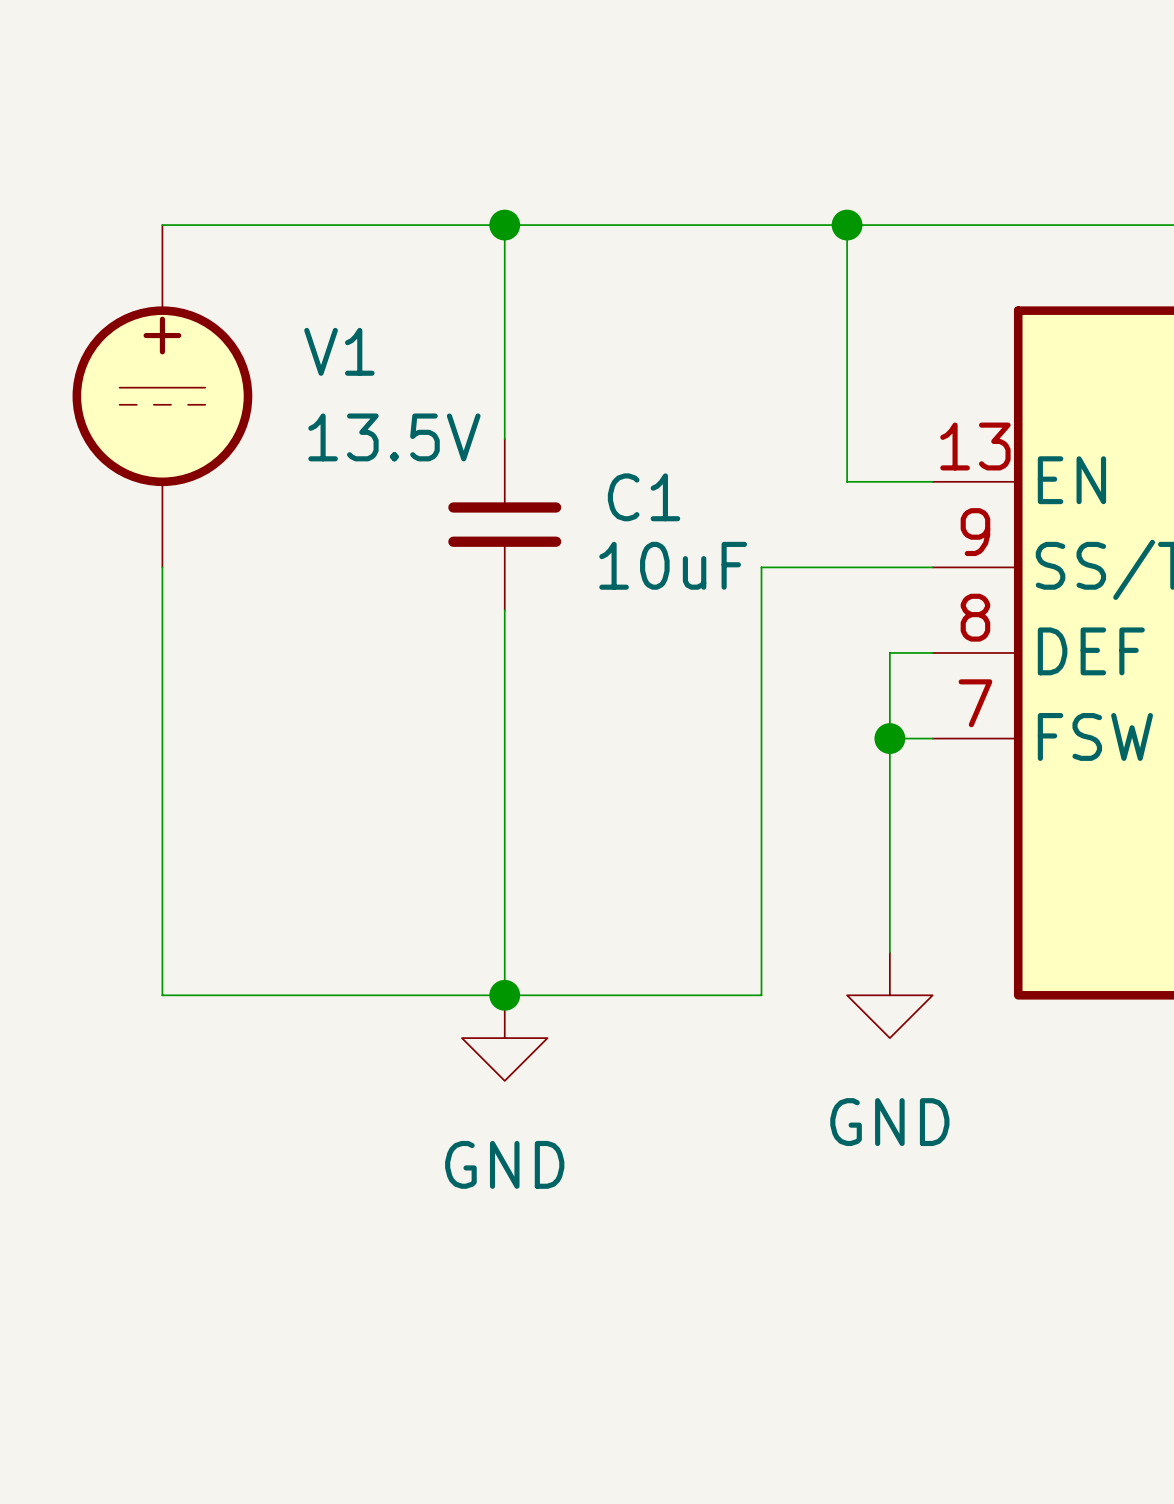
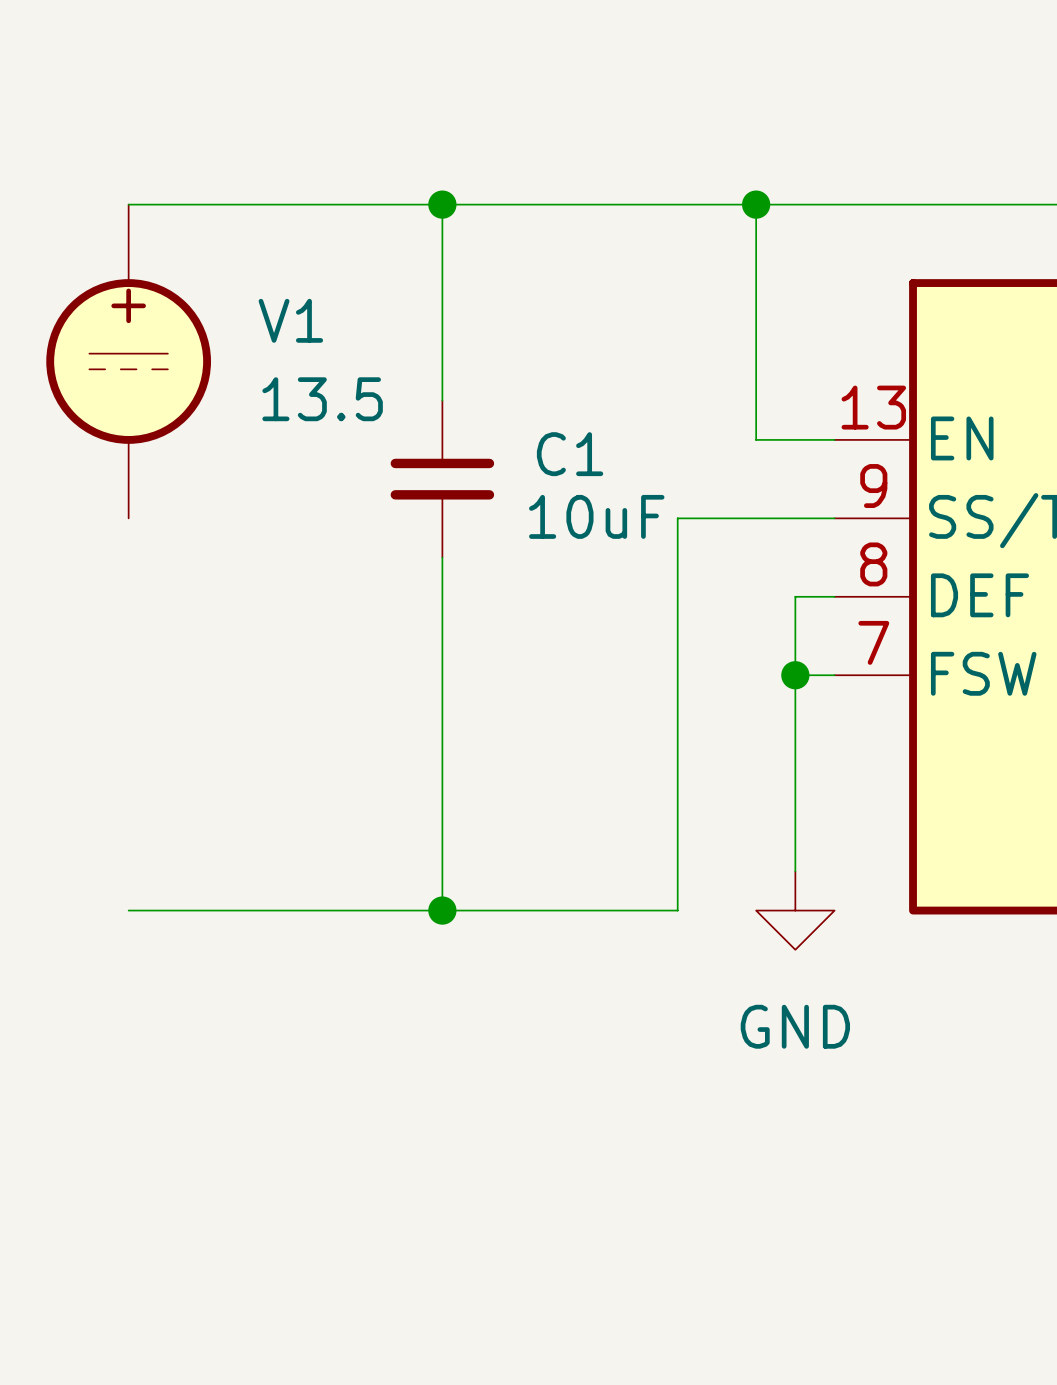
V1 value: 13.5V (394, 437) -> 13.5 (322, 399)
wire: (162, 567) (162, 995) -> none
power symbol: GND (504, 1038) -> none

